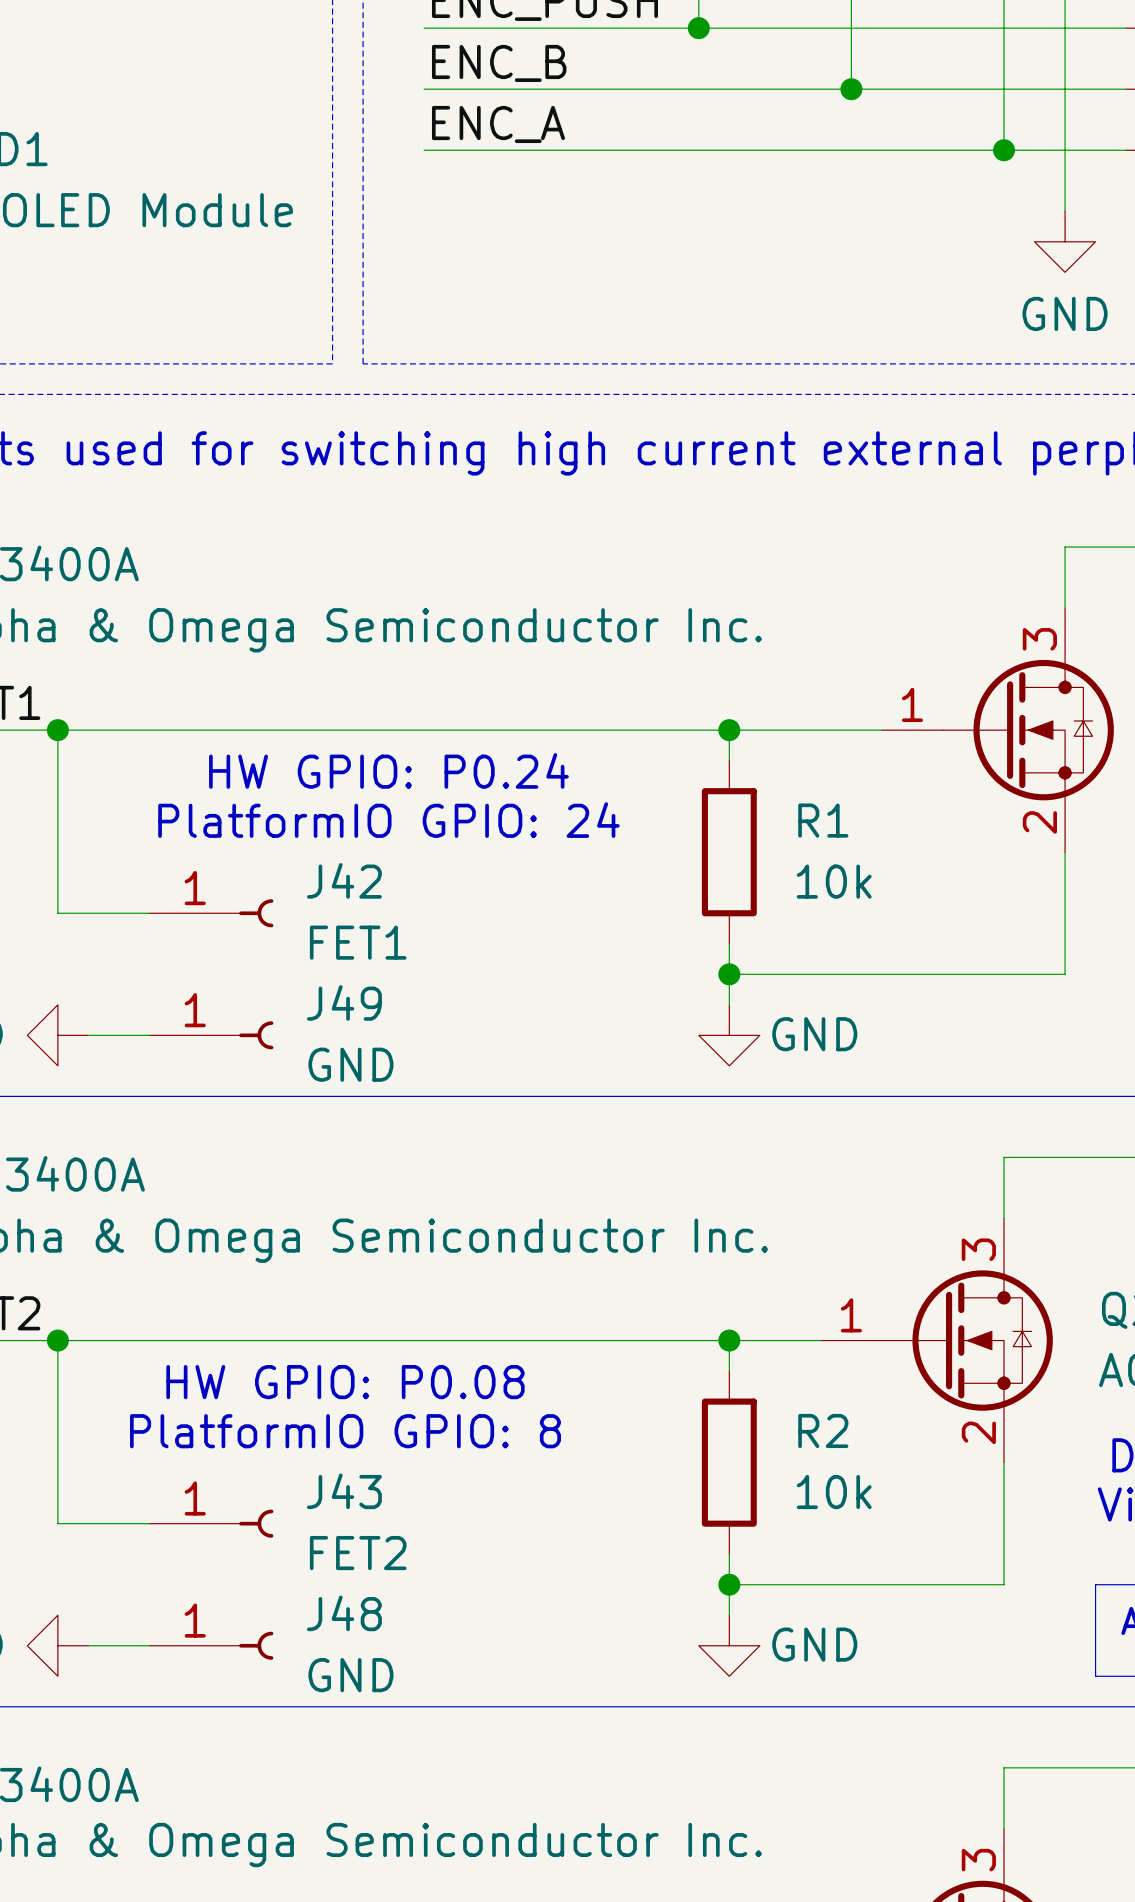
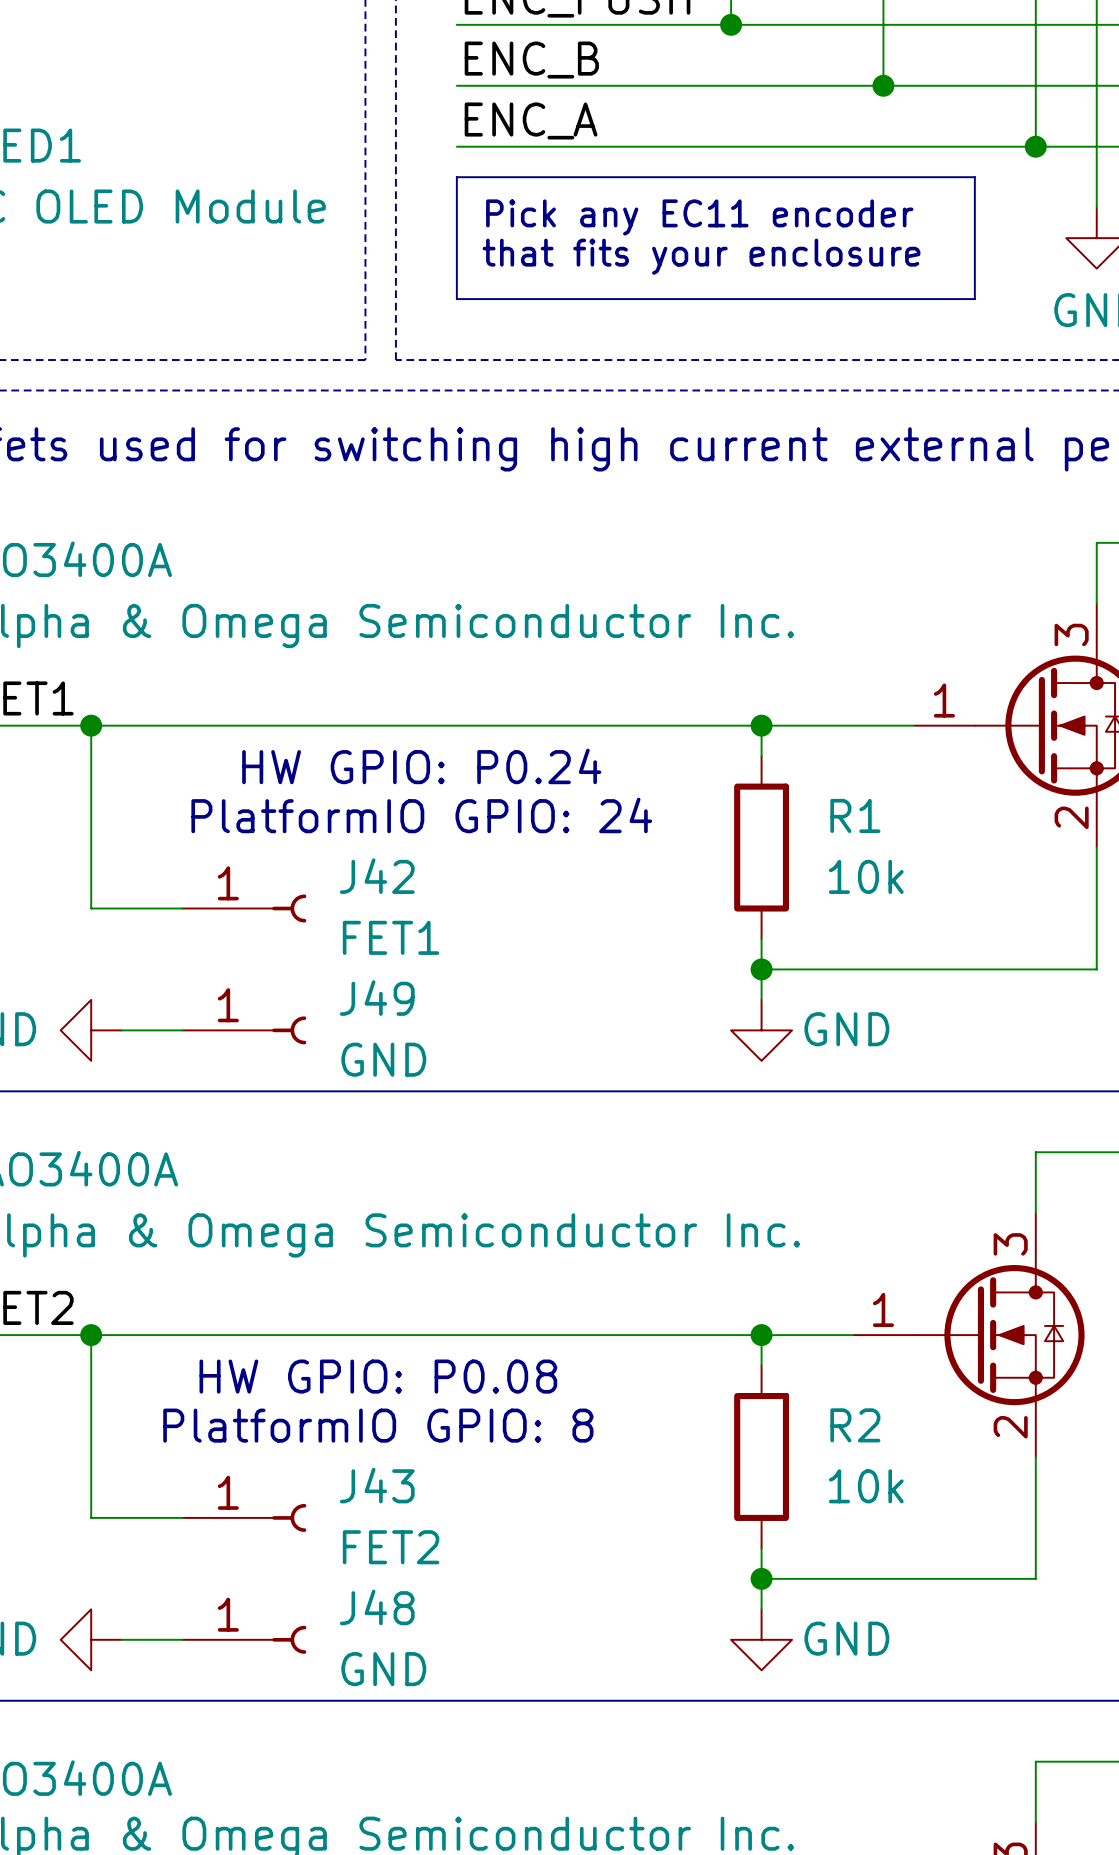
line: none -> (456, 177) (974, 177) (974, 299) (456, 299) (456, 177)
text: none -> Pick any EC11 encoder (699, 217)
text: none -> that fits your enclosure (701, 256)

